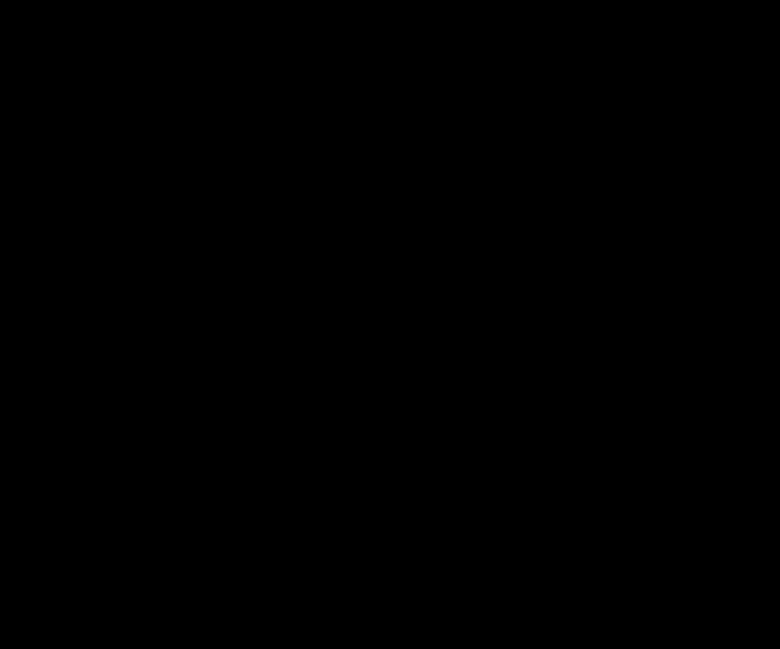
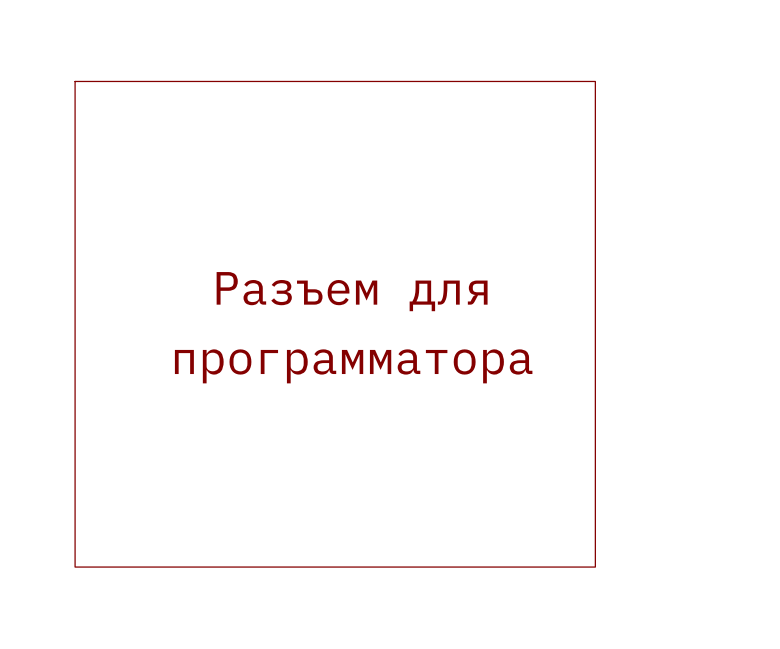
part: none -> (335, 324)

